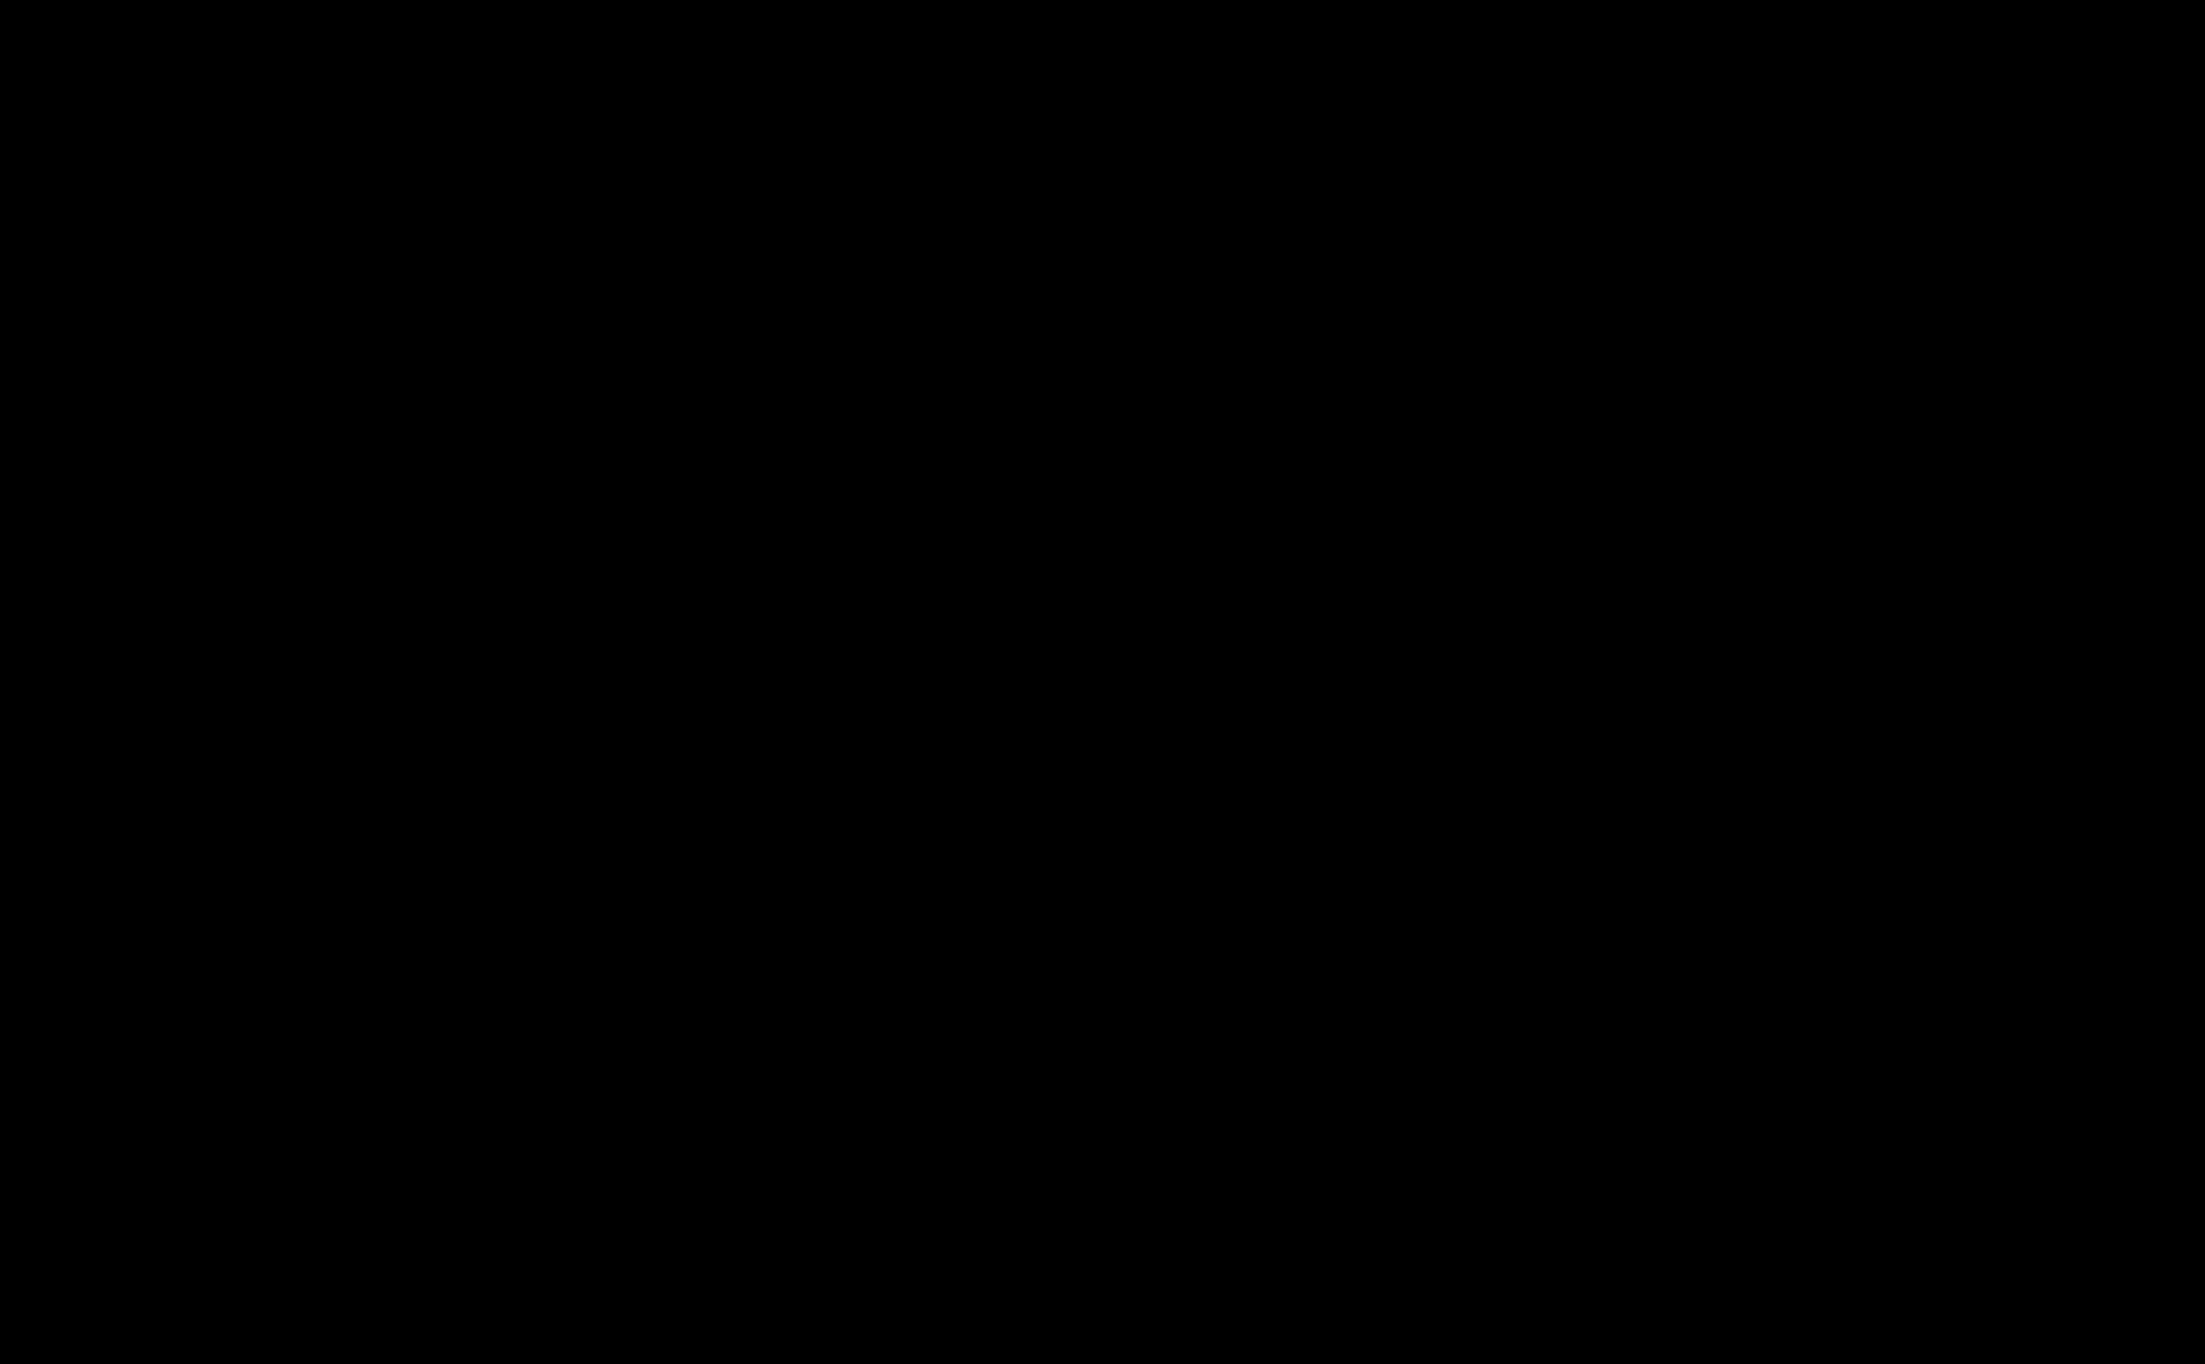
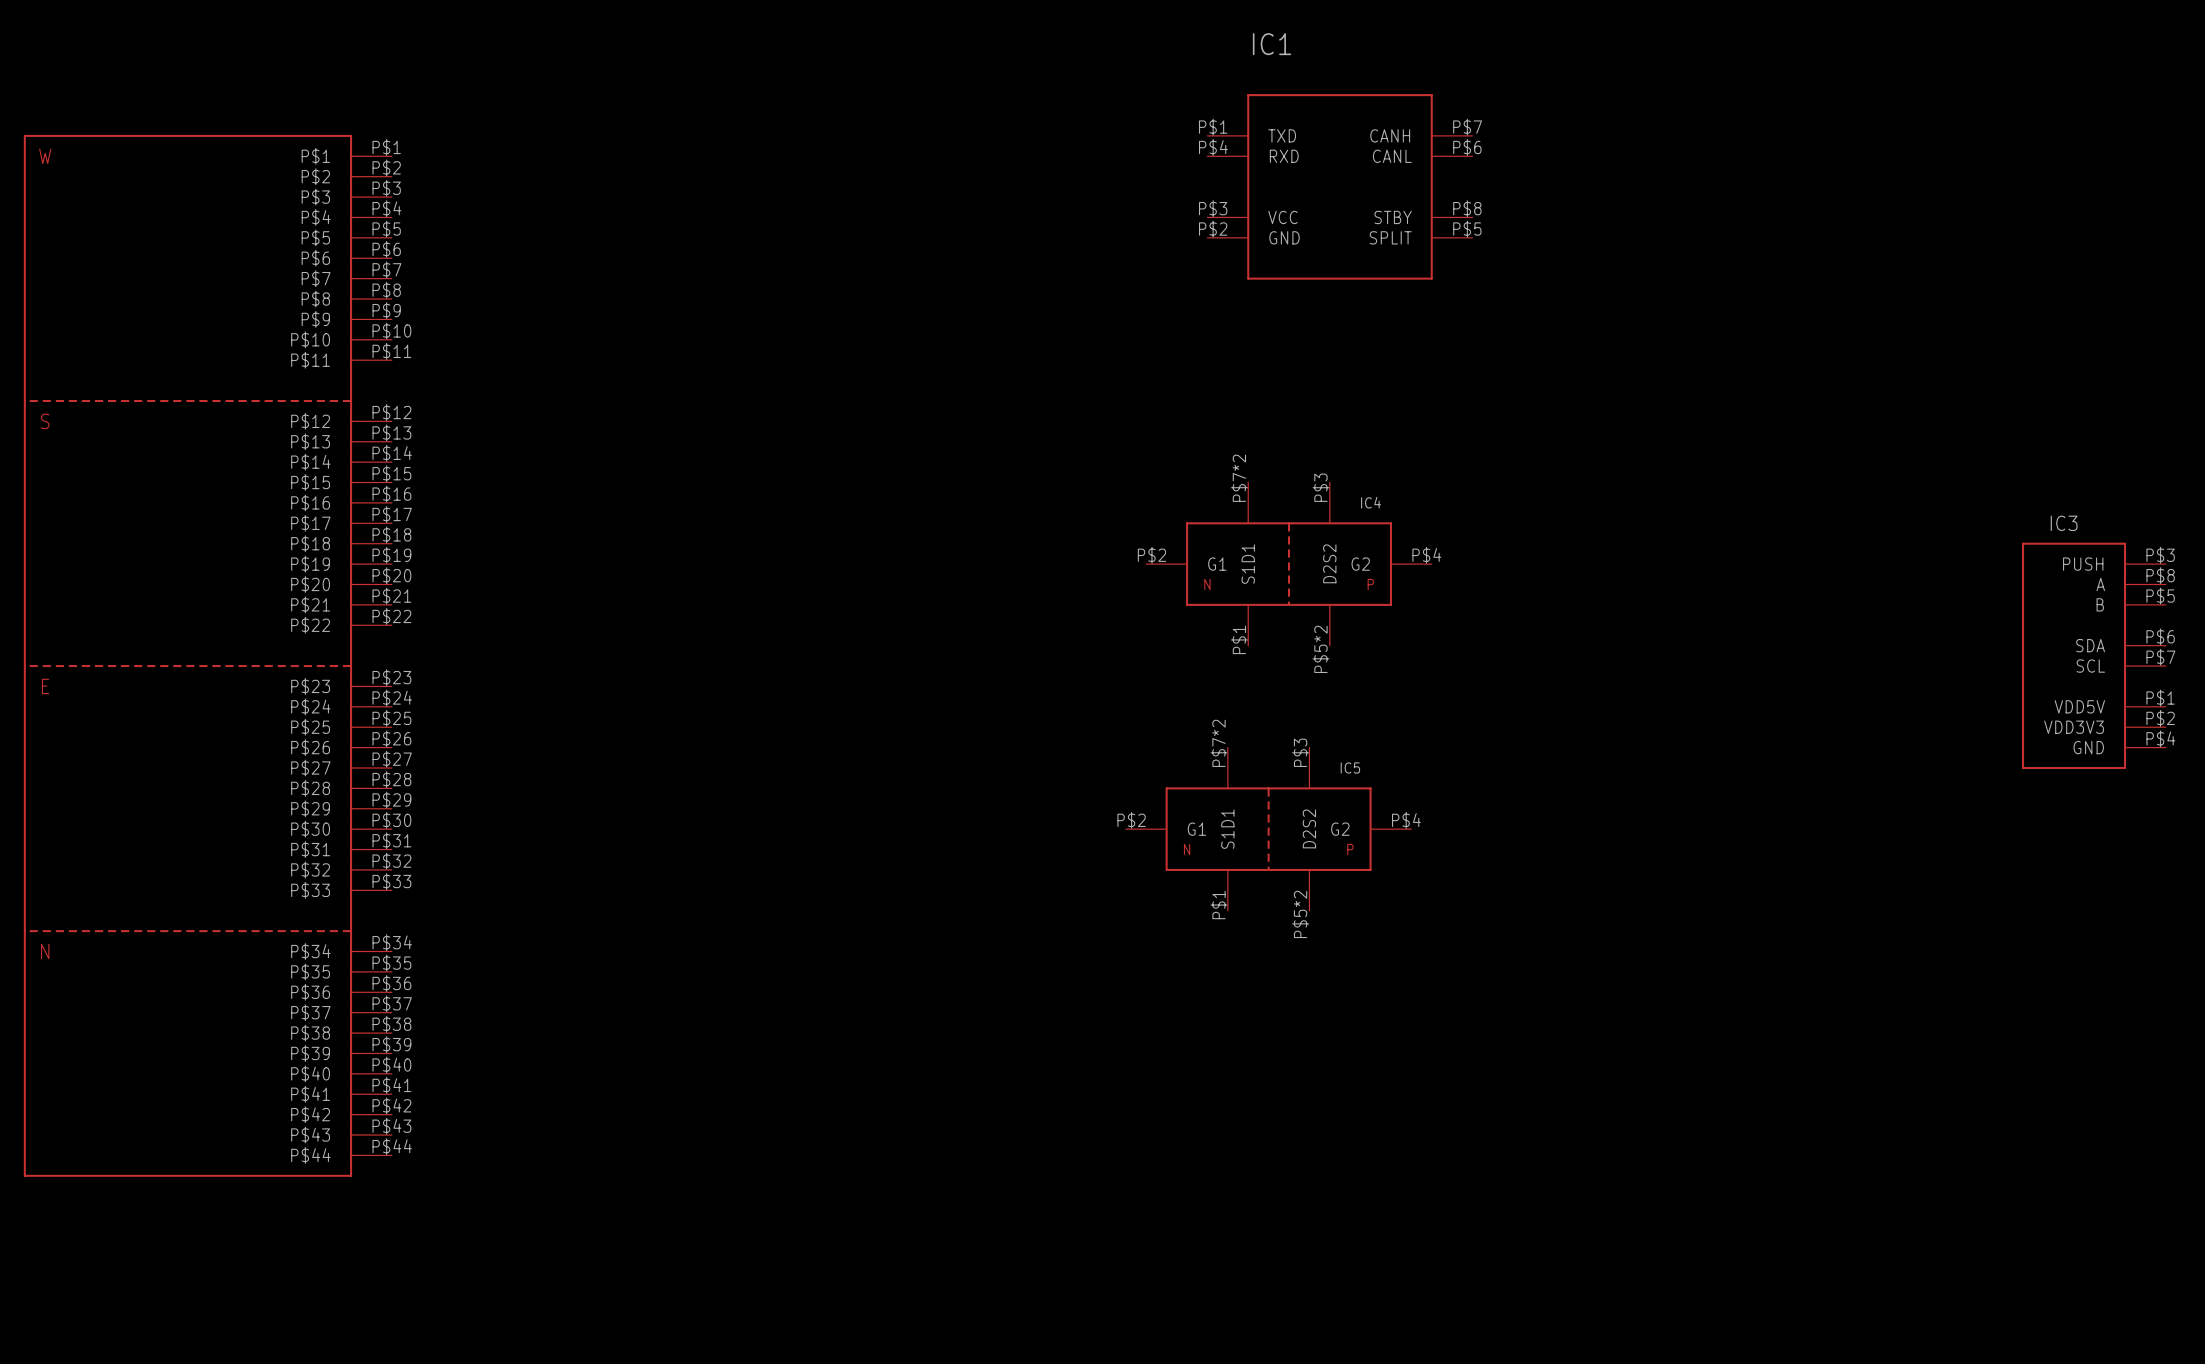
IC1: none -> (1339, 186)
IC4: none -> (1289, 564)
part: none -> (207, 655)
IC3: none -> (2093, 655)
IC5: none -> (1268, 829)

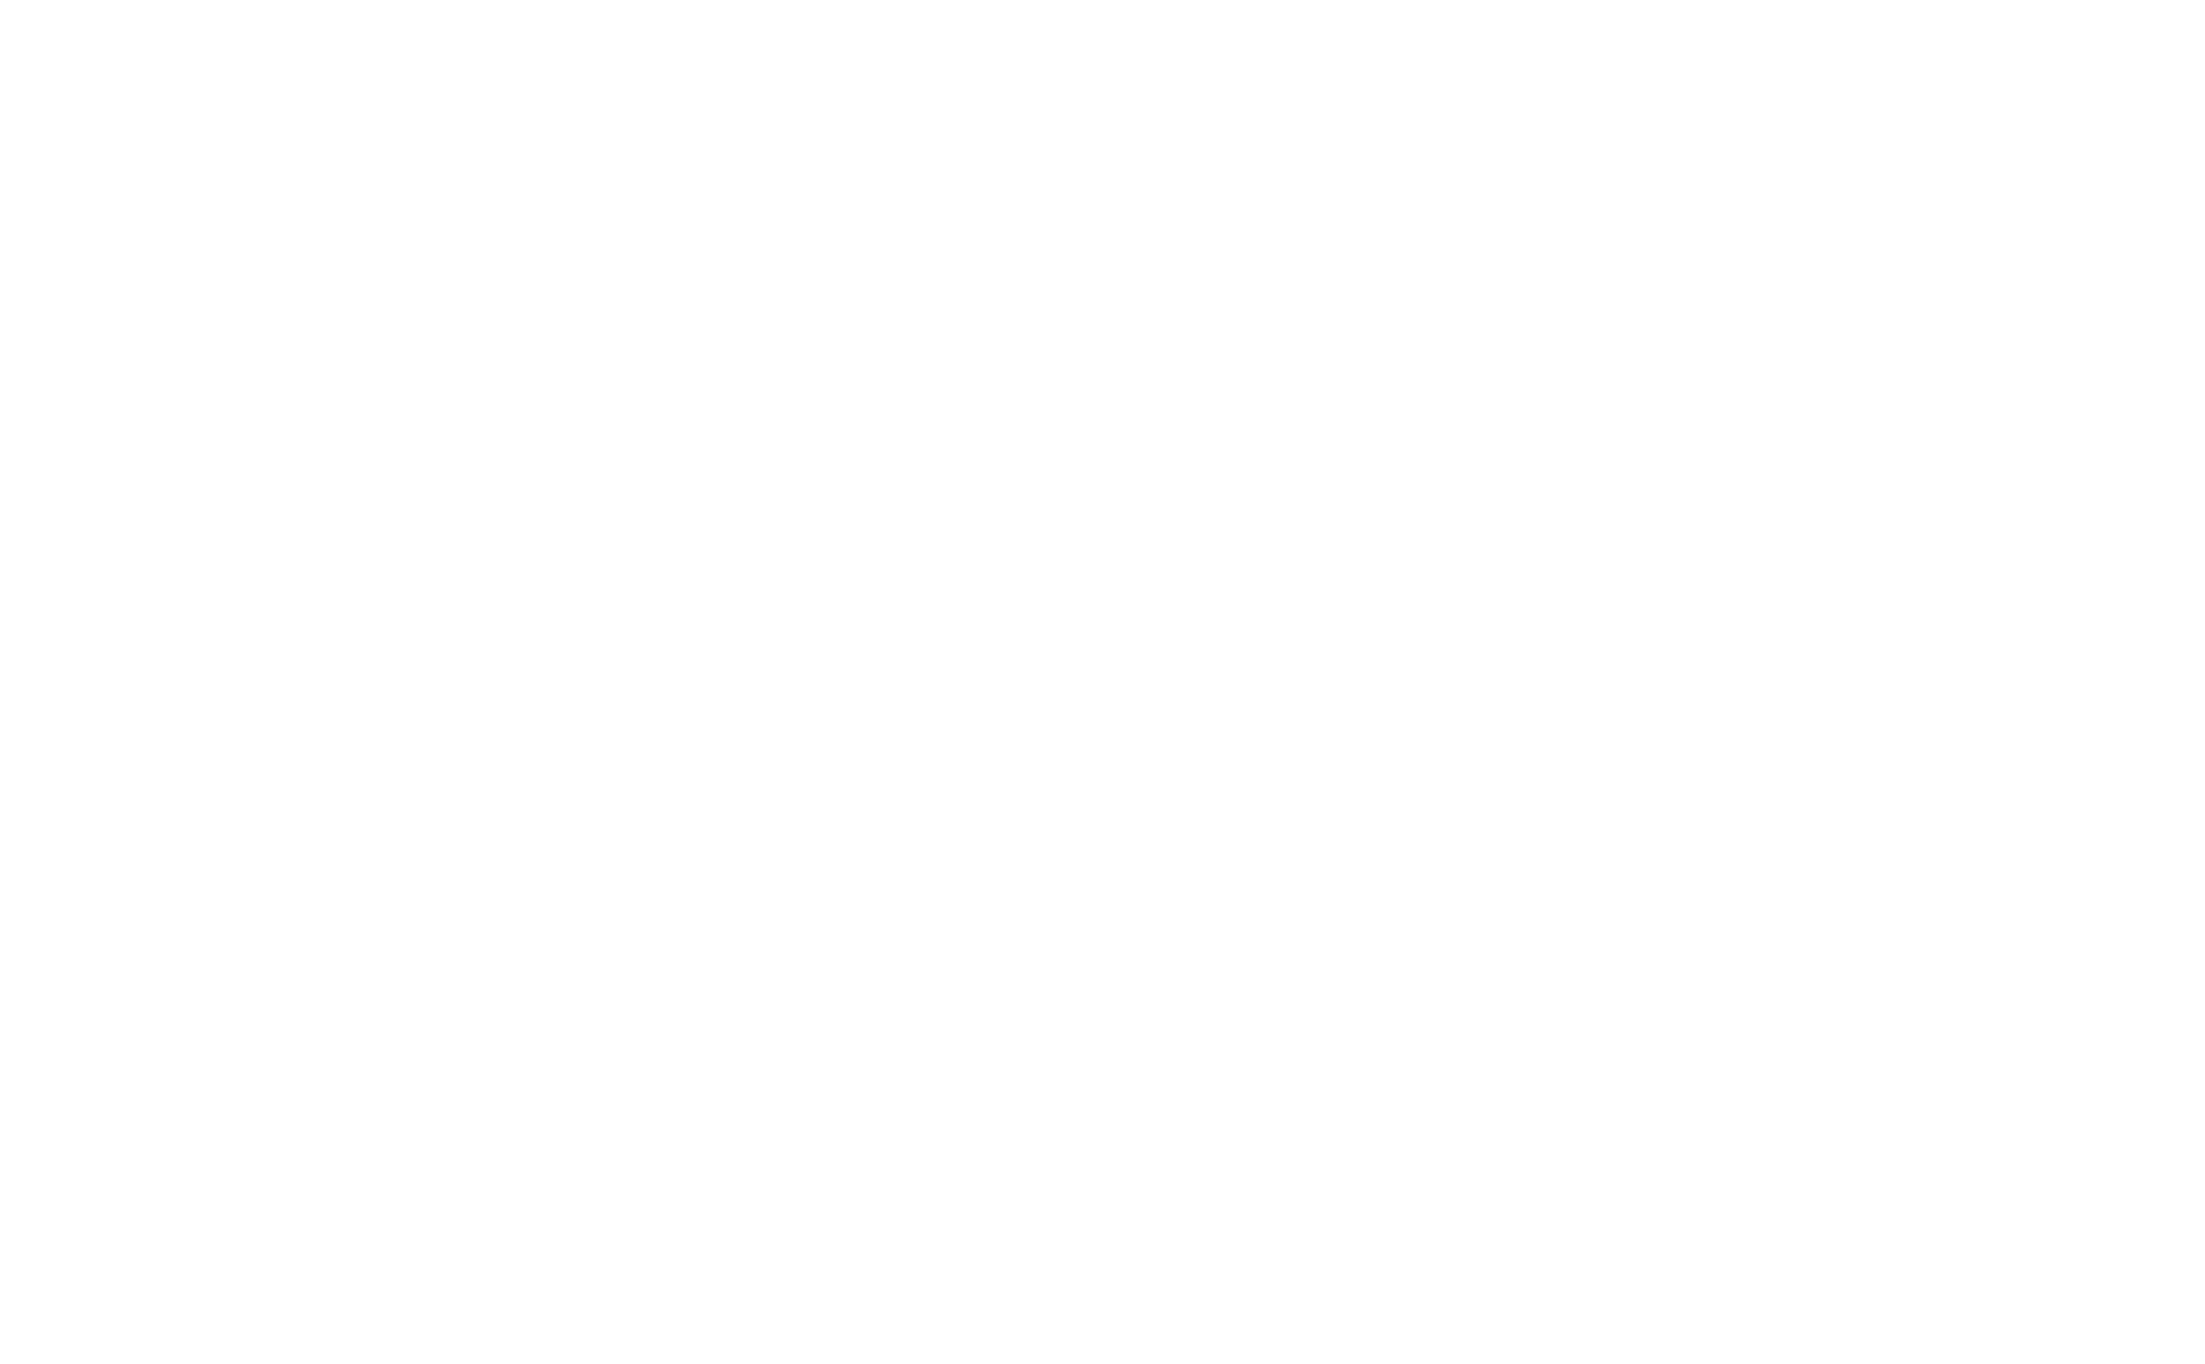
IC1: (1339, 186) -> none
IC4: (1289, 564) -> none
part: (207, 655) -> none
IC3: (2093, 655) -> none
IC5: (1268, 829) -> none

